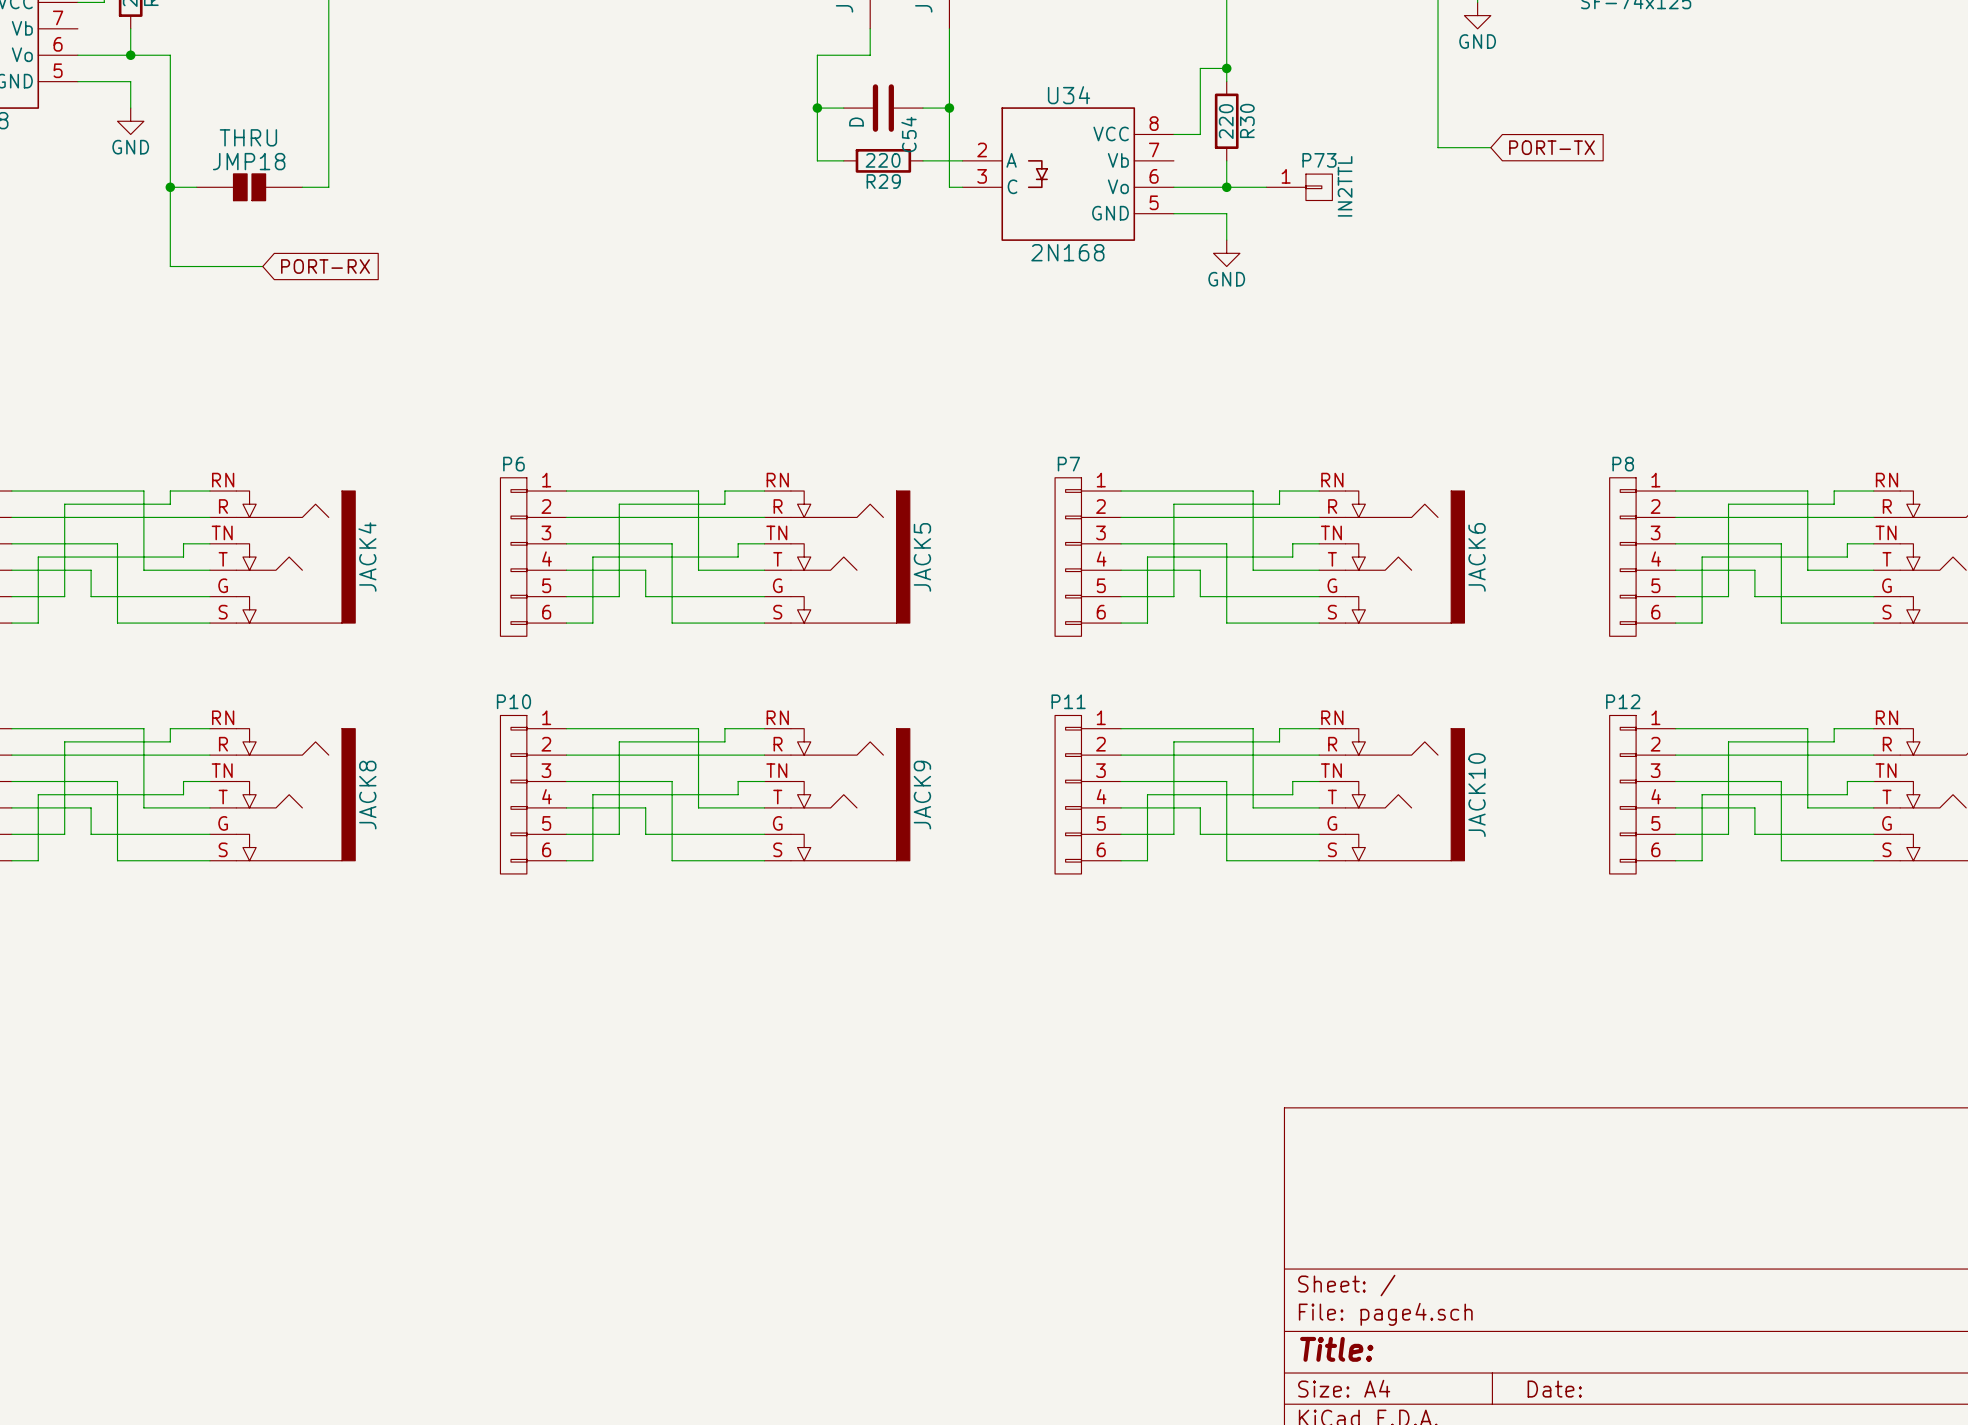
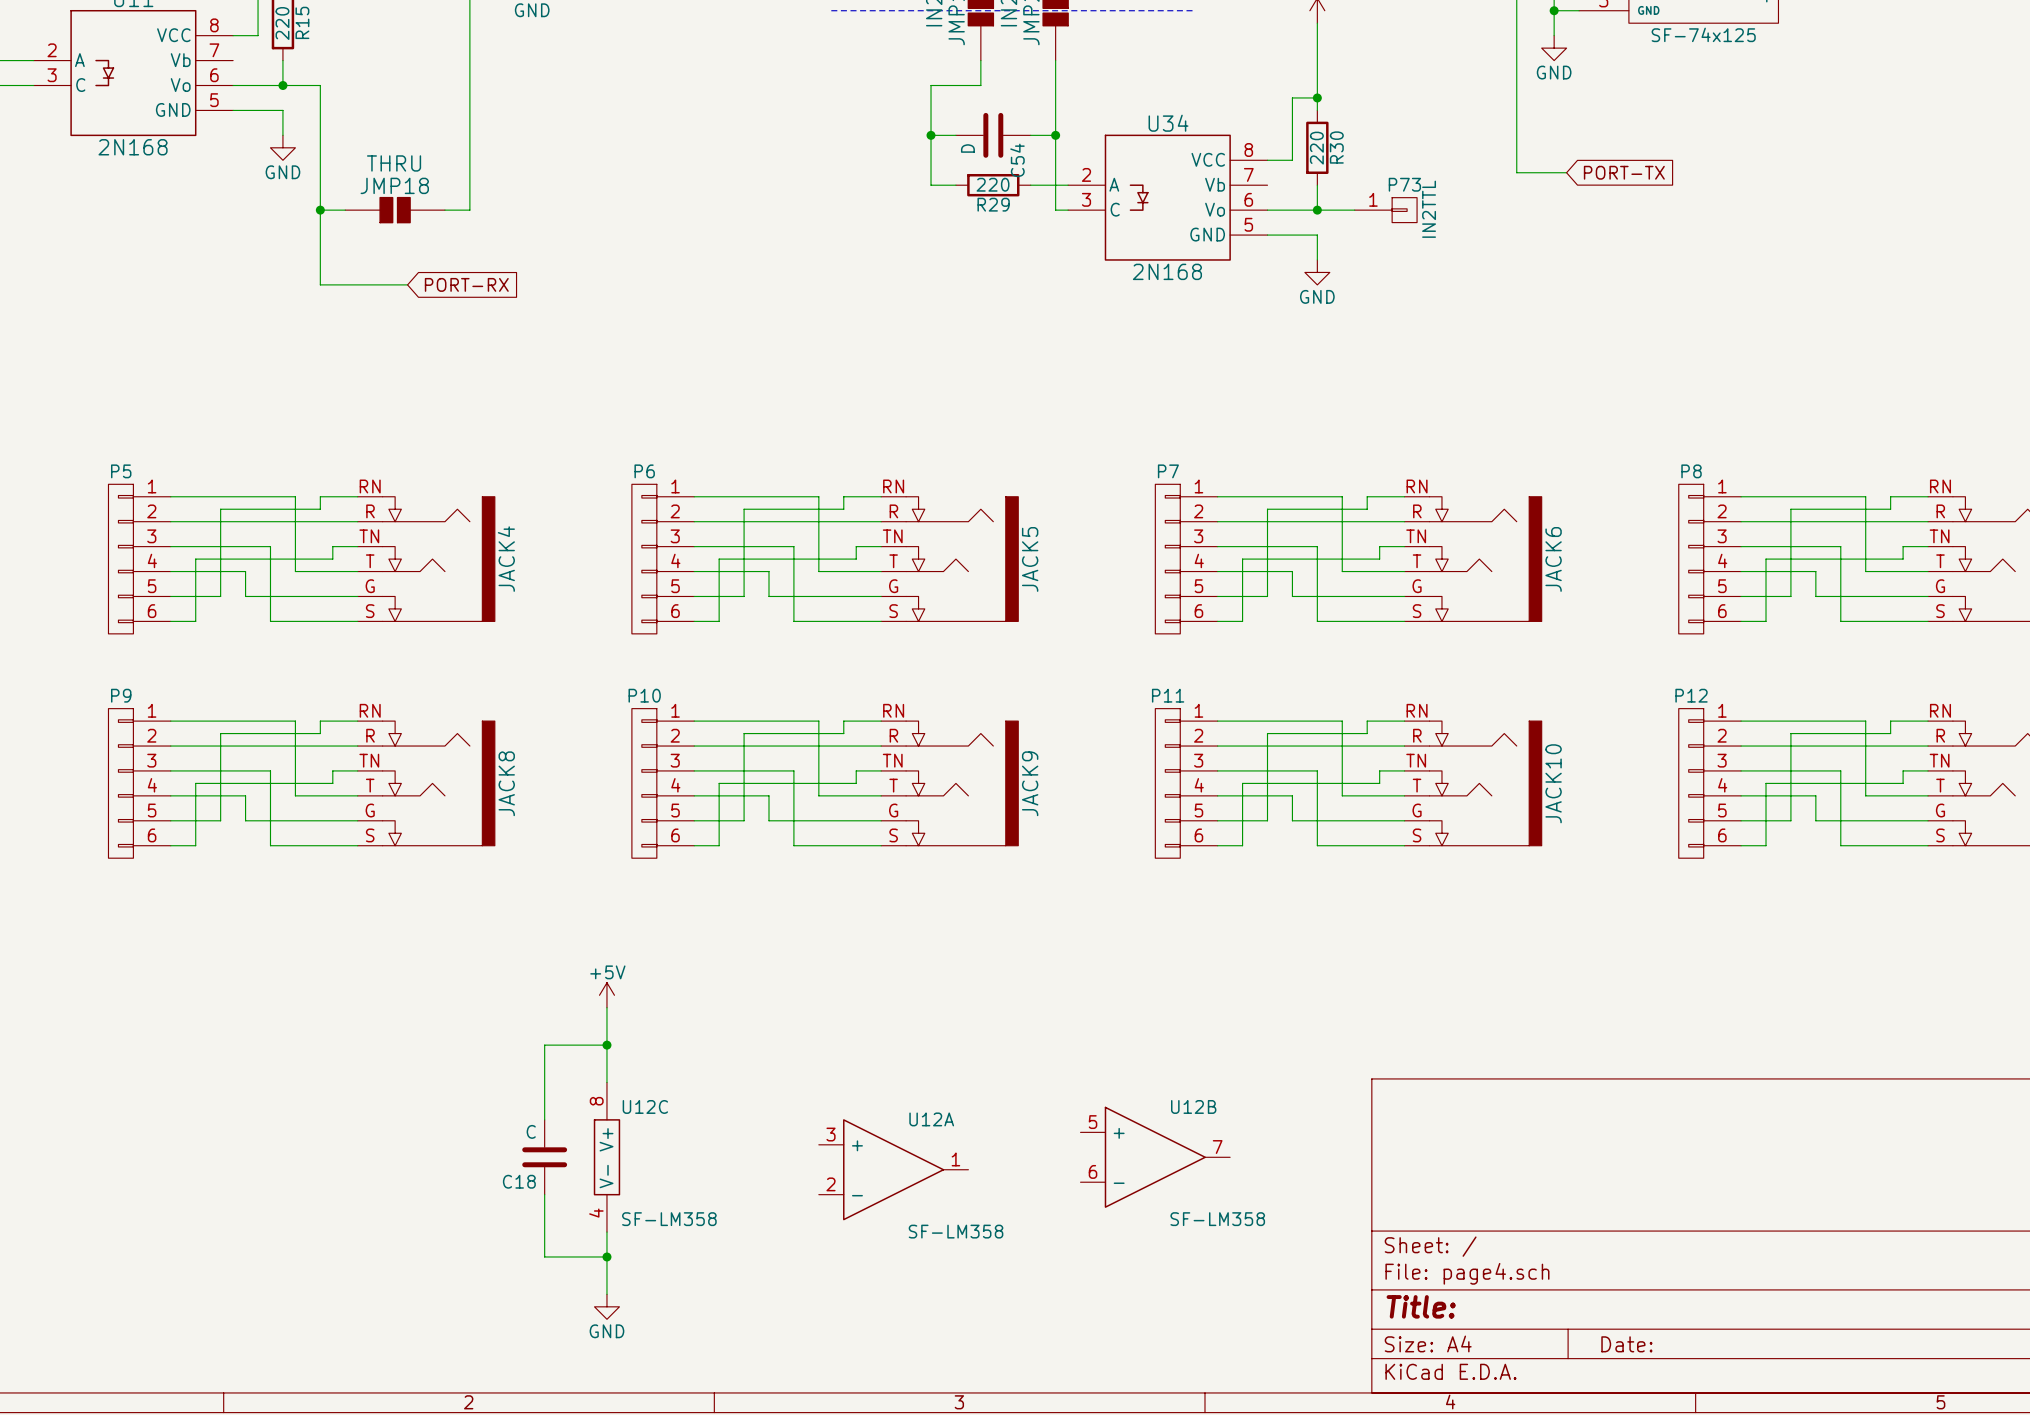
power symbol: none -> +5V (606, 995)
wire: none -> (606, 1007) (606, 1082)
wire: none -> (606, 1045) (544, 1045) (544, 1119)
junction: none -> (606, 1045)
C18: none -> C (544, 1157)
U12C: none -> SF-LM358 (606, 1157)
U12B: none -> SF-LM358 (1155, 1157)
U12A: none -> SF-LM358 (893, 1169)
wire: none -> (544, 1194) (544, 1256) (606, 1256)
wire: none -> (606, 1232) (606, 1294)
junction: none -> (606, 1256)
power symbol: none -> GND (606, 1306)

